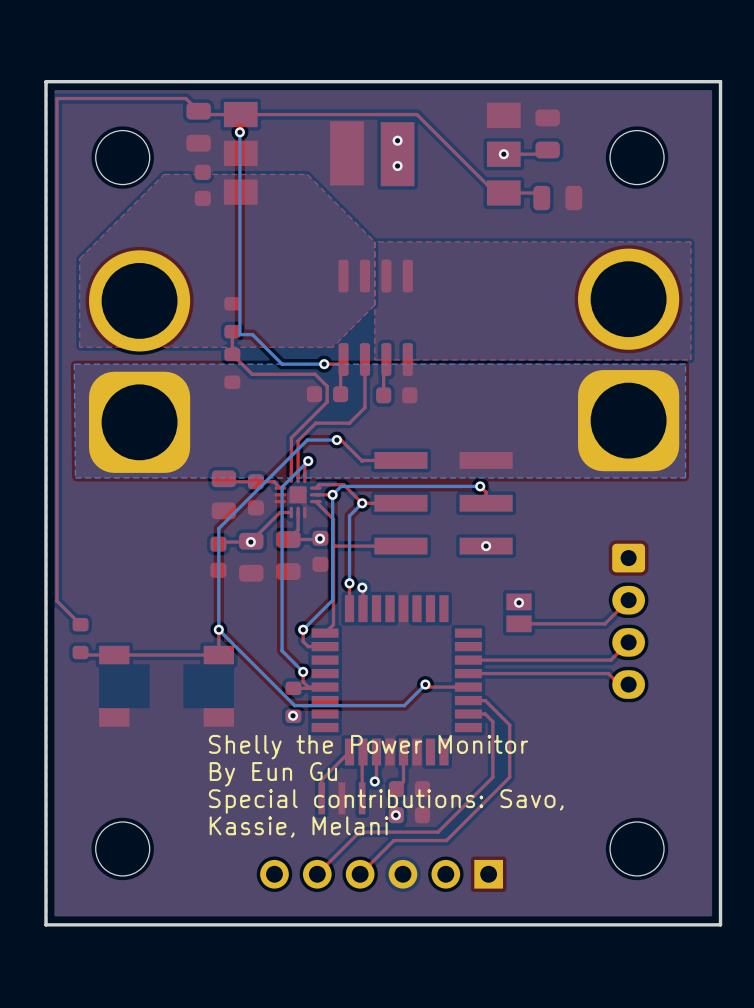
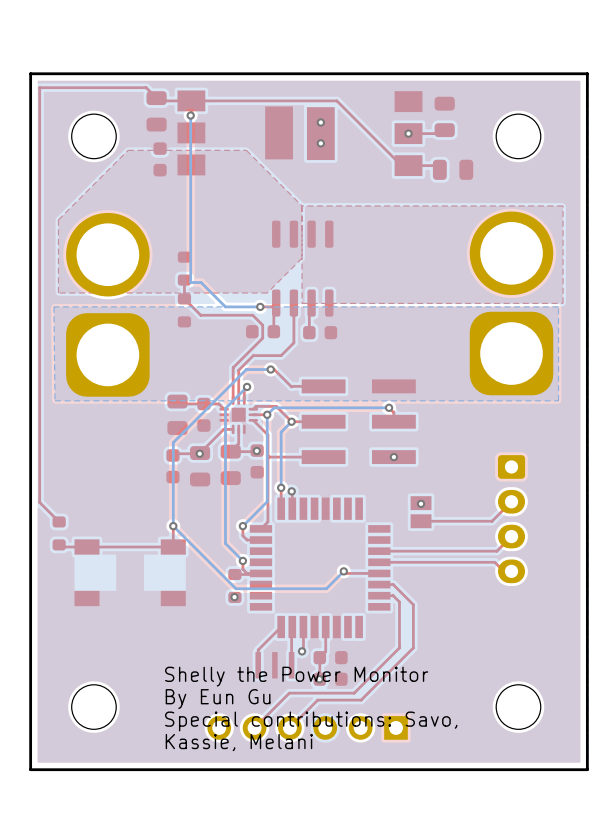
text position: Shelly the Power Monitor (368, 747) -> Shelly the Power Monitor (296, 676)
text position: By Eun Gu (273, 774) -> By Eun Gu (218, 699)
text position: Special contributions: Savo, (386, 801) -> Special contributions: Savo, (311, 721)
text position: Kassie, Melani (299, 827) -> Kassie, Melani (239, 742)

